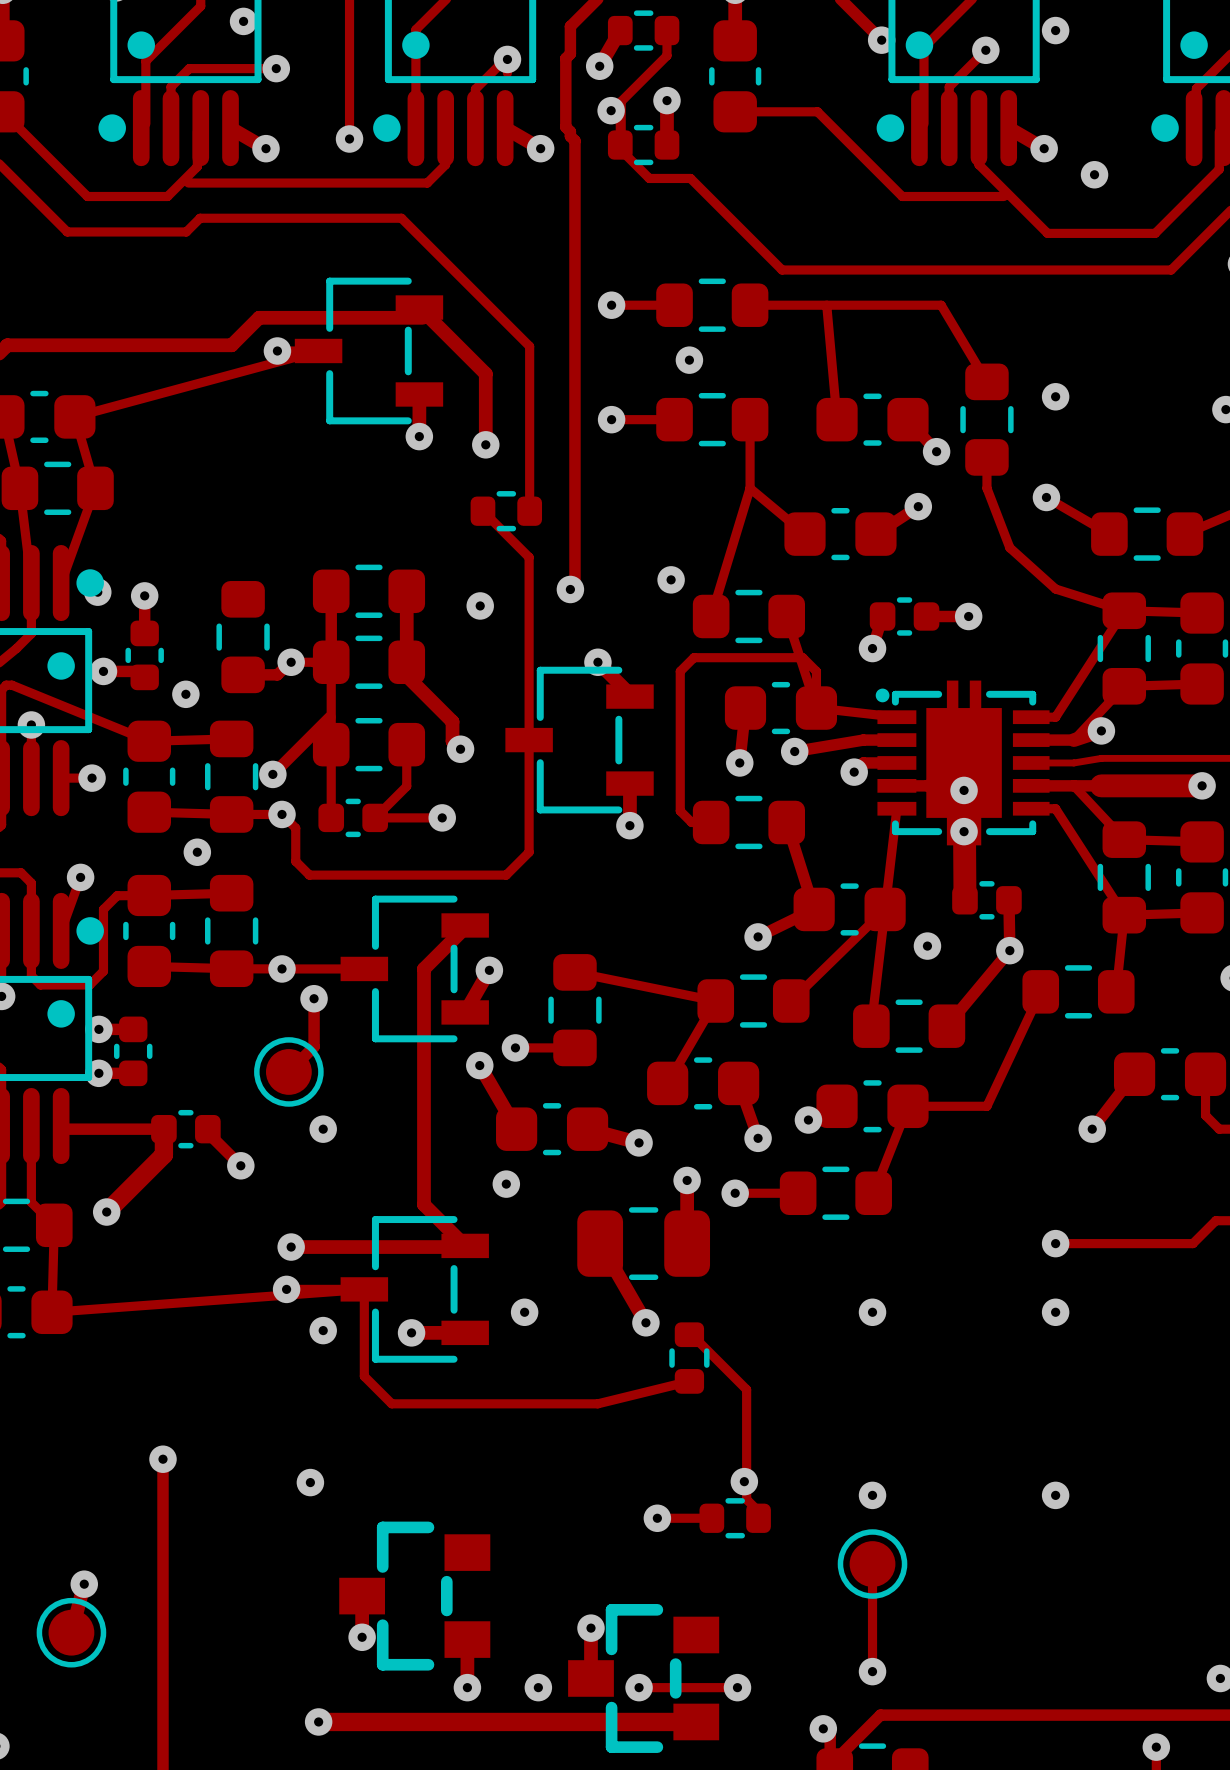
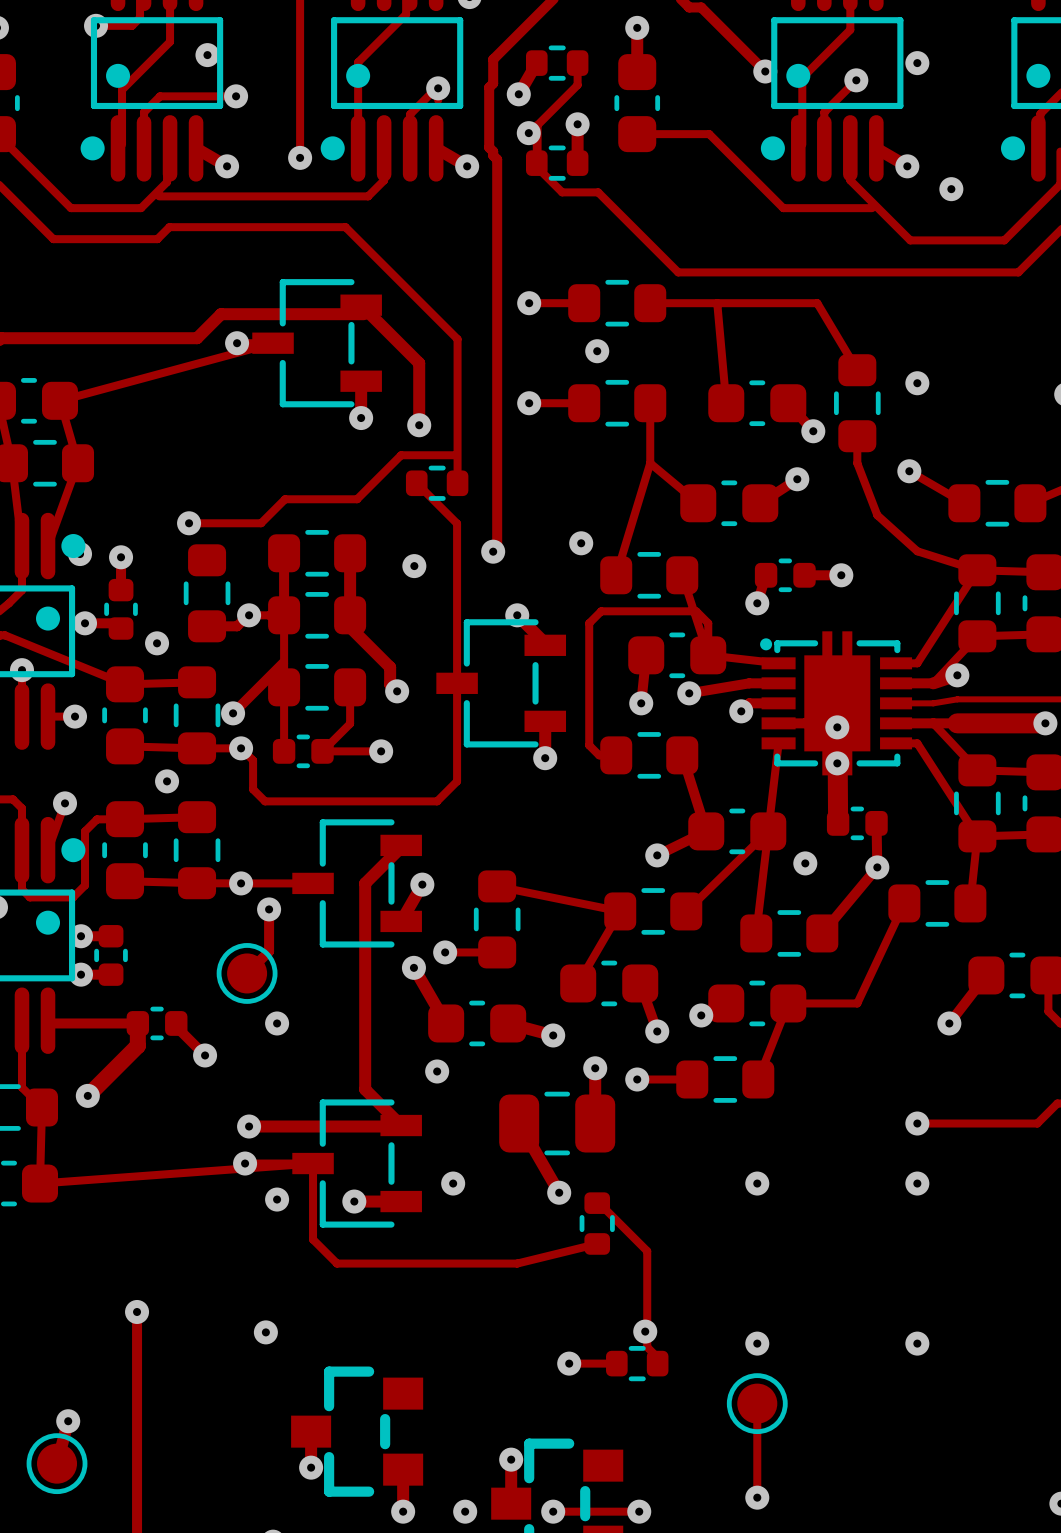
track: none -> (453, 455) (401, 455) (357, 499) (285, 499) (261, 523) (189, 523)
via: none -> (189, 523)

